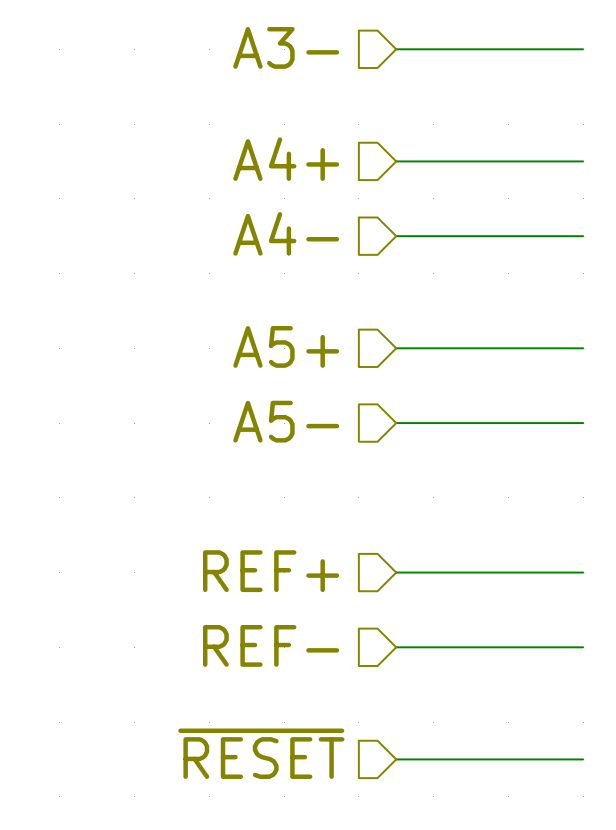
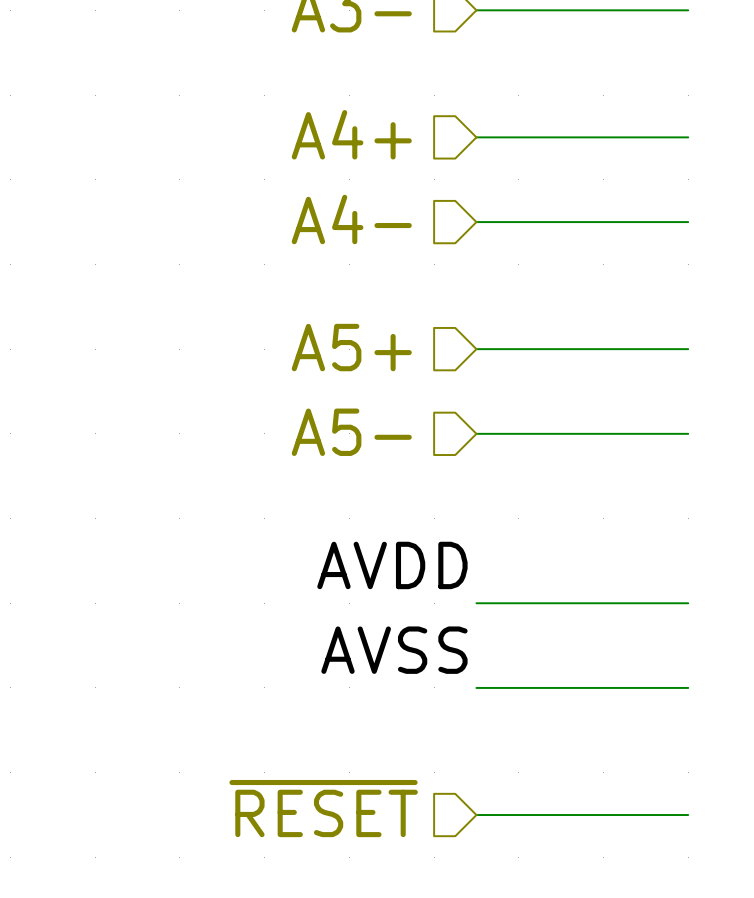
label: none -> AVDD (392, 565)
hierarchical label: REF+ (271, 571) -> none
label: none -> AVSS (394, 650)
hierarchical label: REF- (271, 645) -> none

